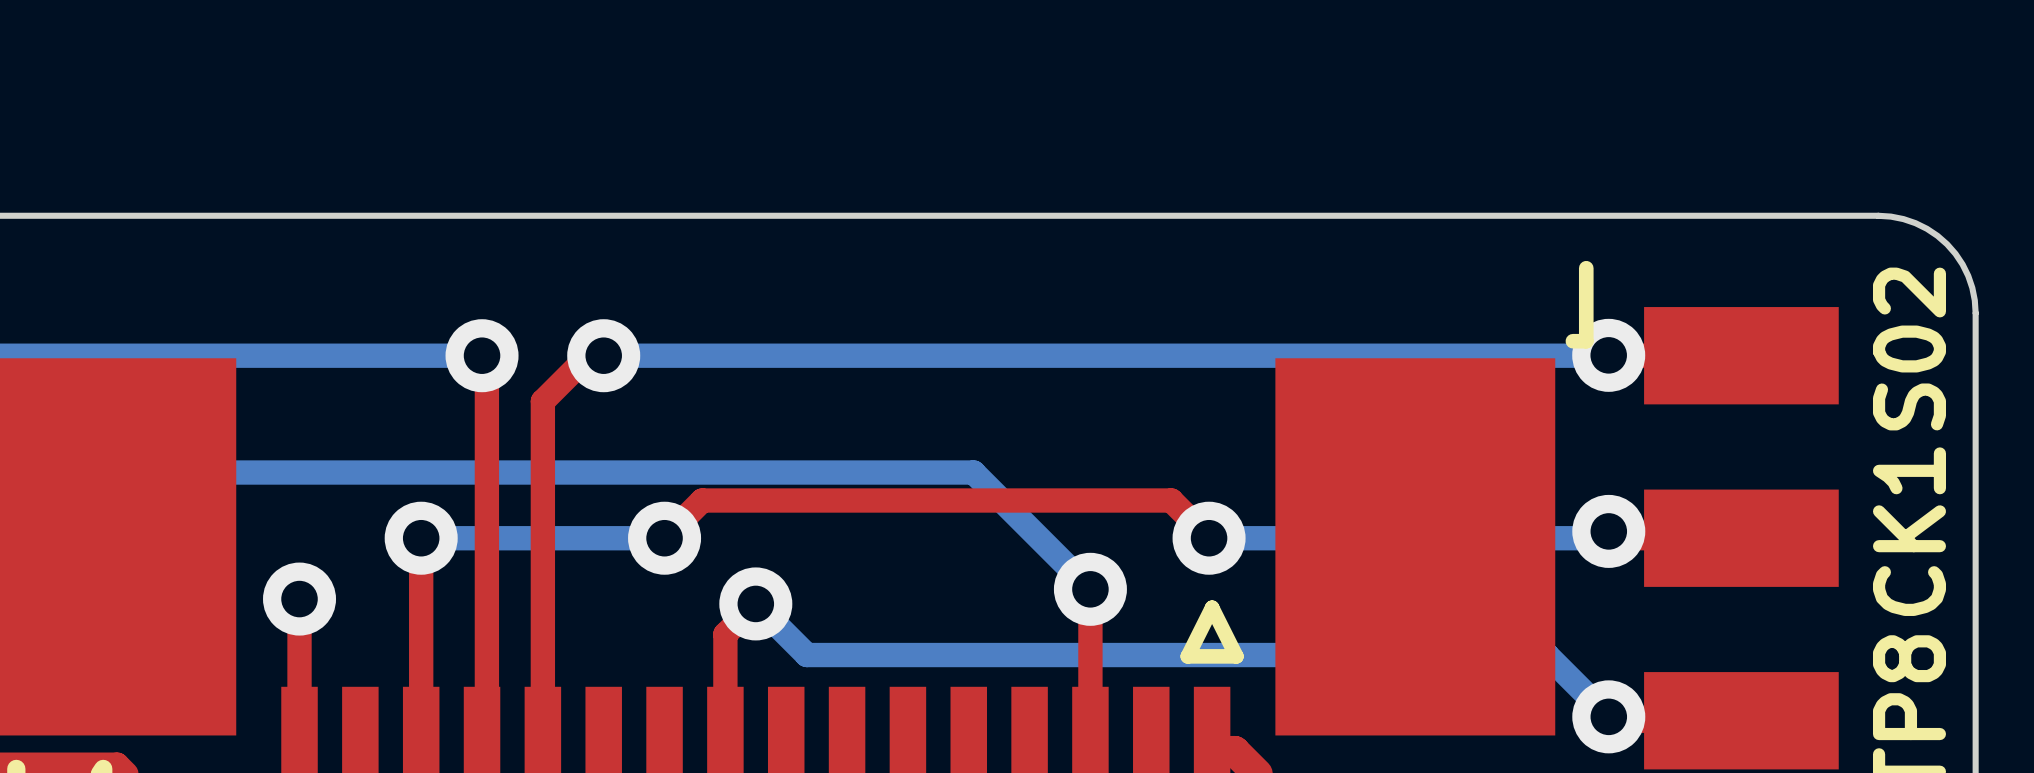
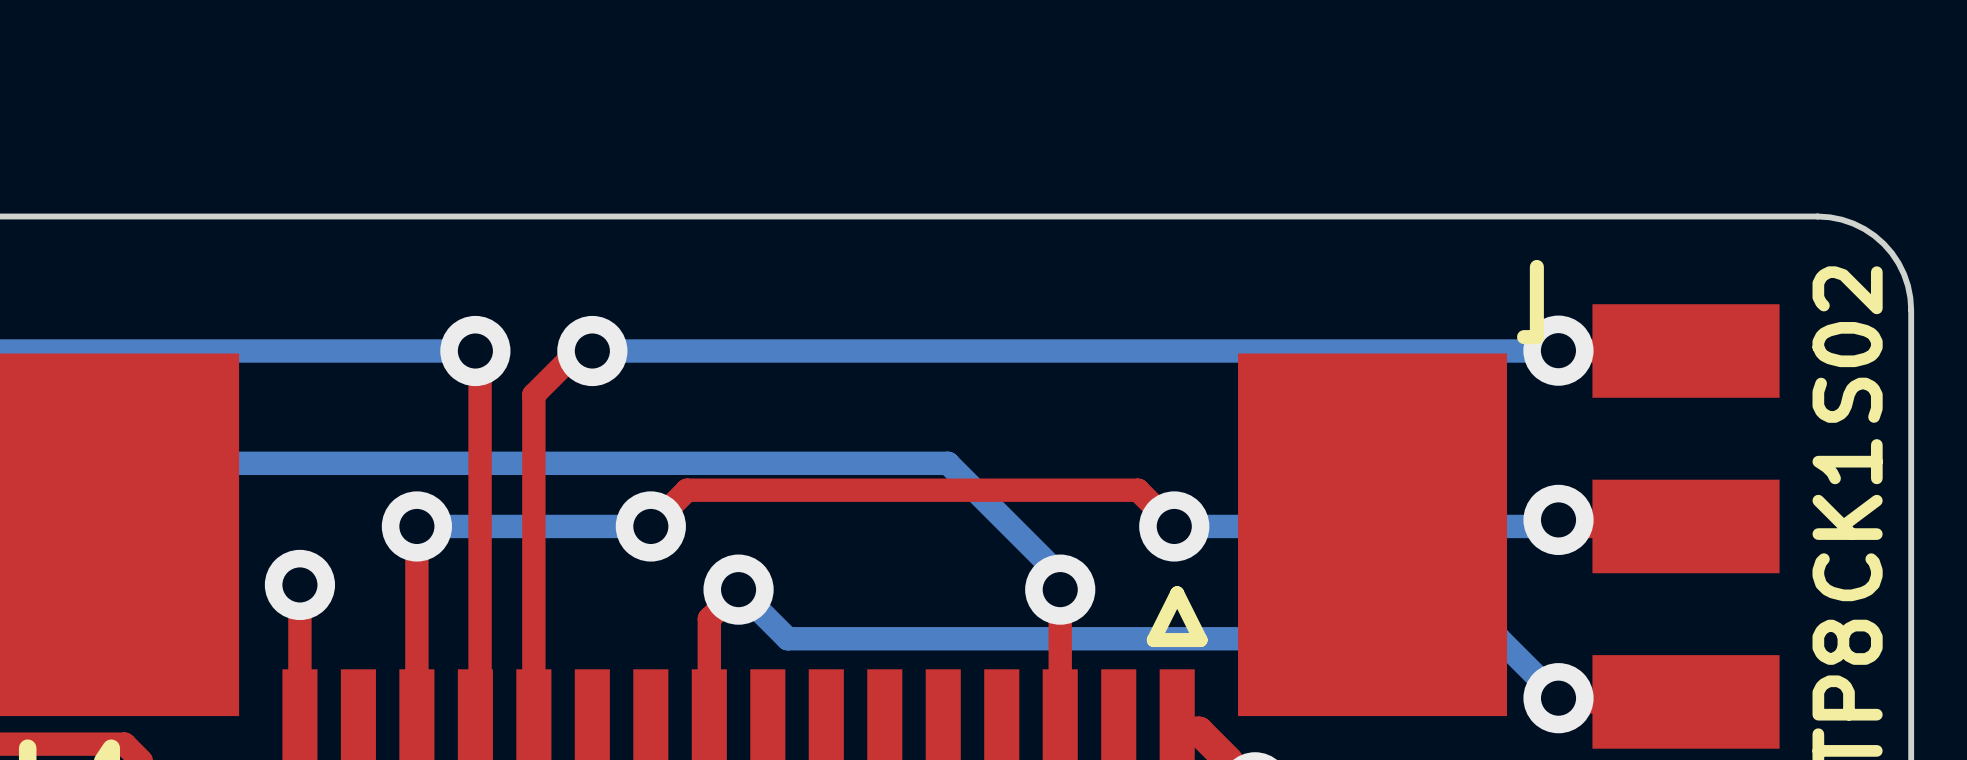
via position: (1090, 589) -> (1060, 589)

